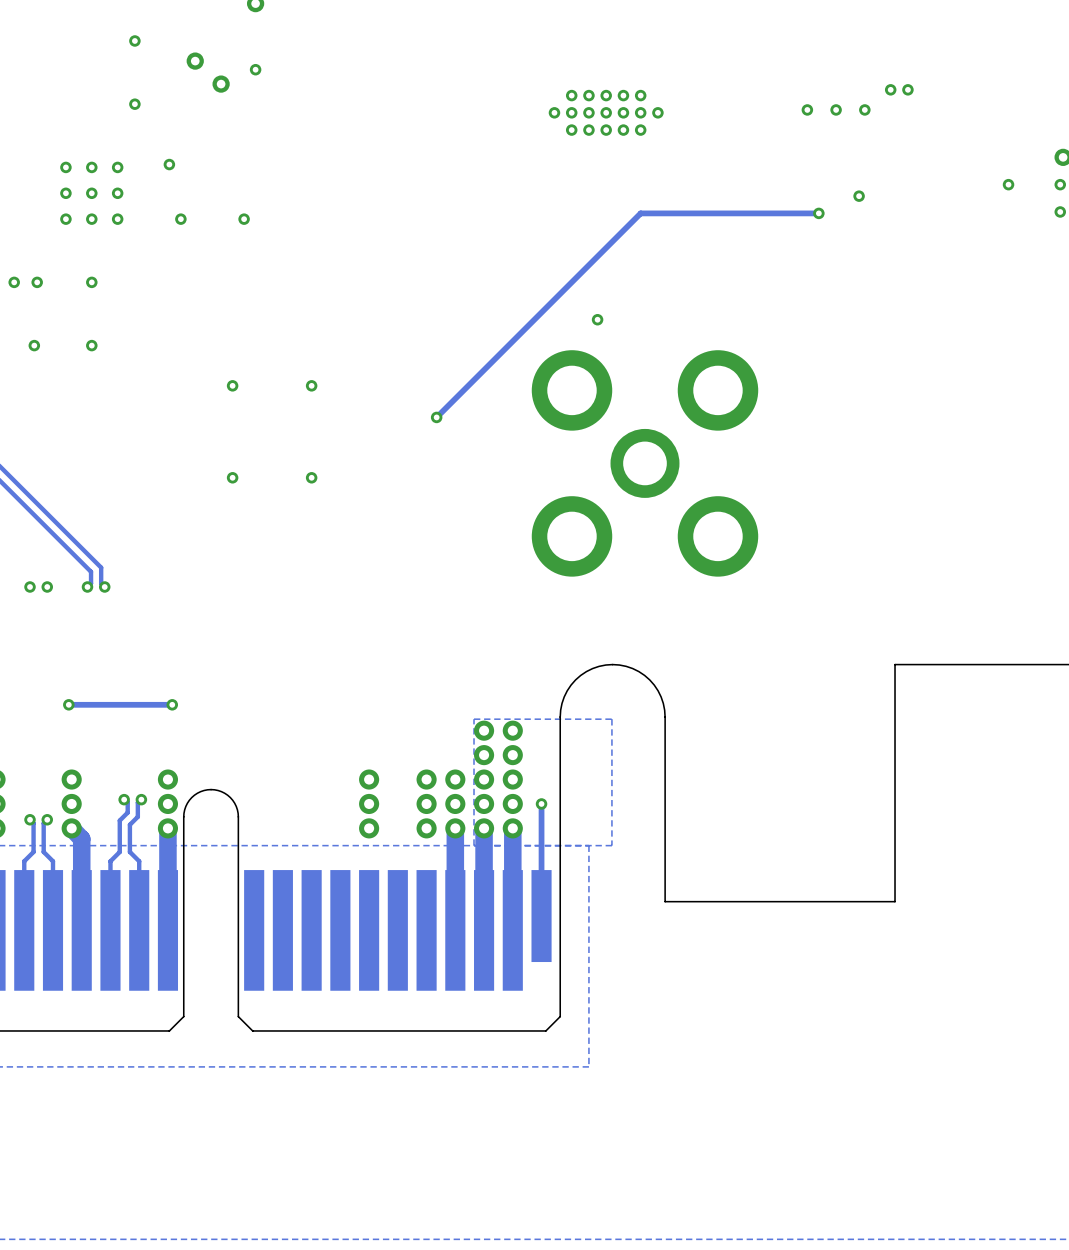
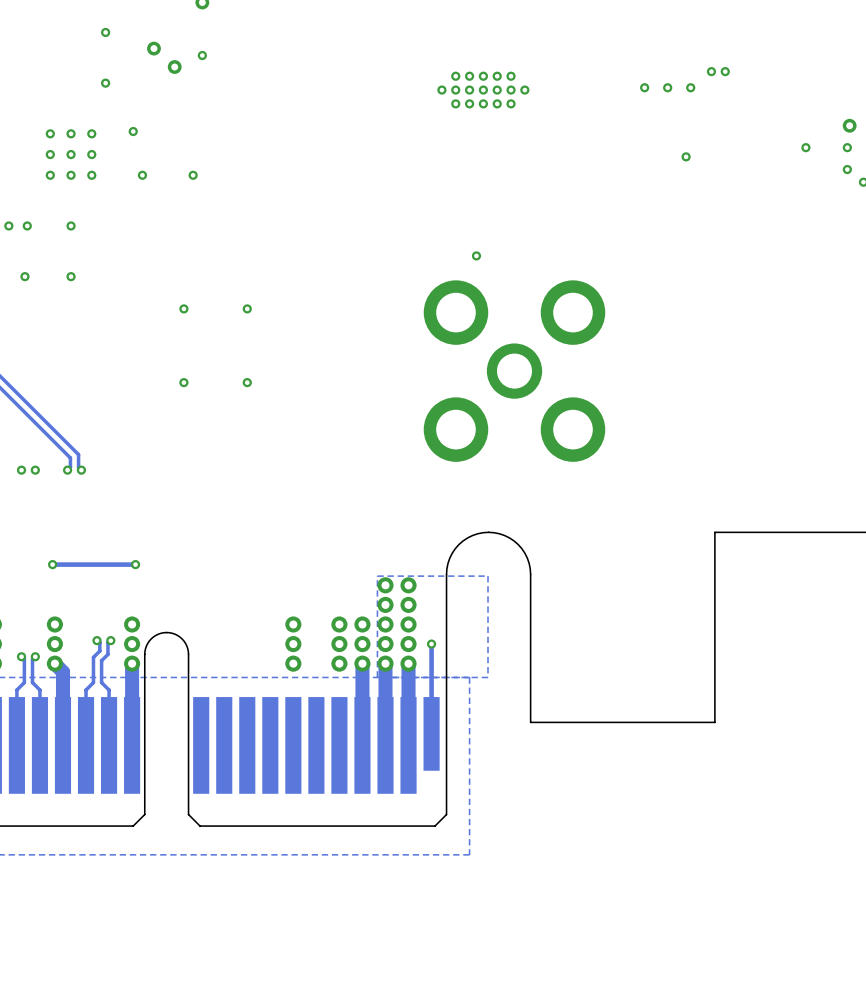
track: (818, 213) (640, 213) (436, 417) -> none
via: (818, 213) -> none
via: (436, 417) -> none

